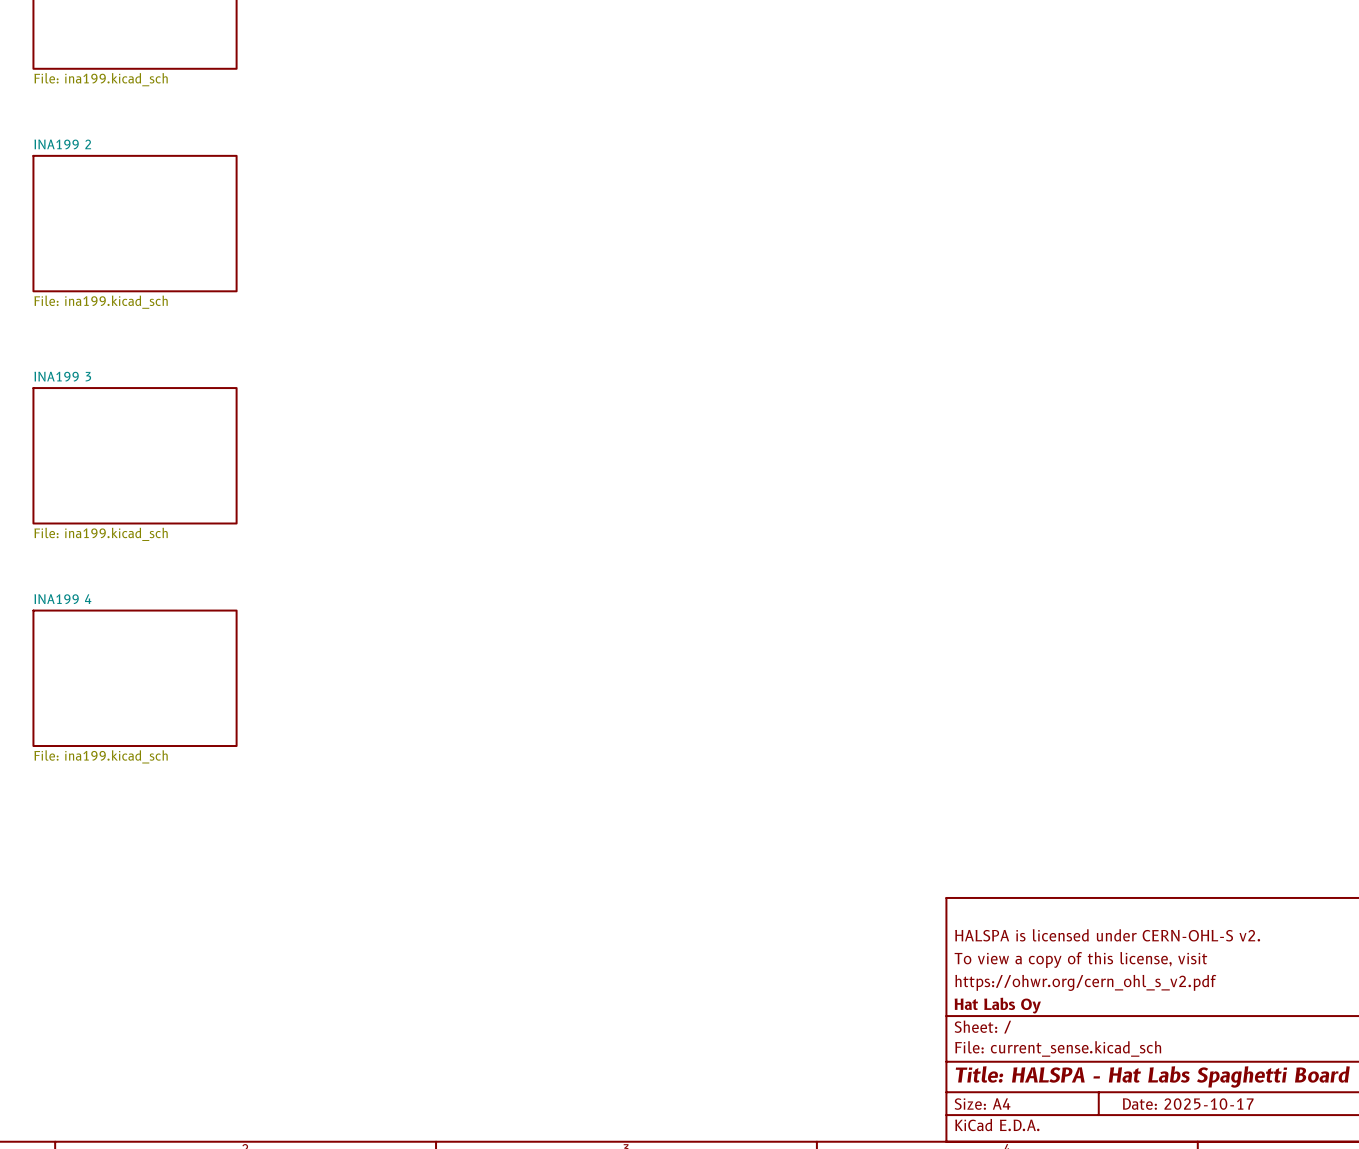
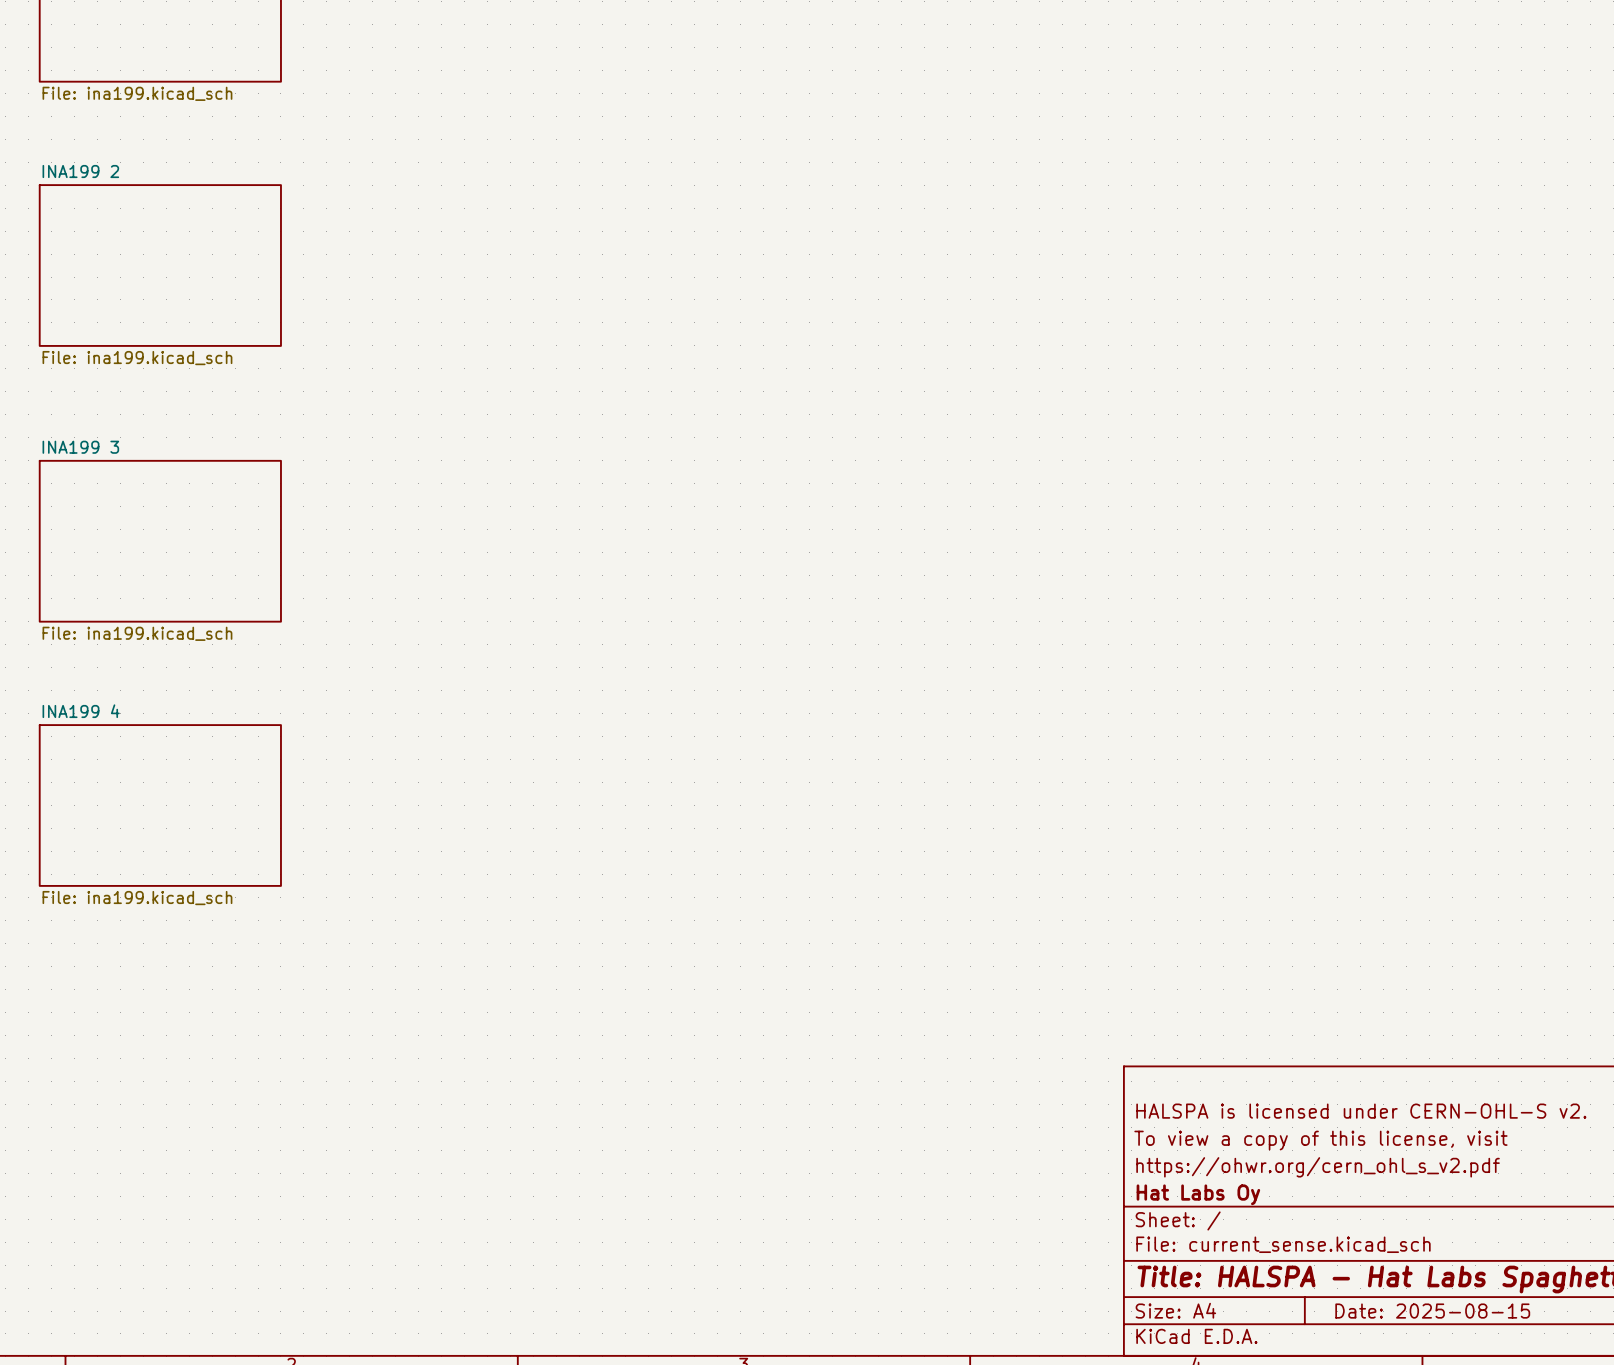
title block: Date: 2025-10-17 (1188, 1104) -> Date: 2025-08-15 (1432, 1311)

